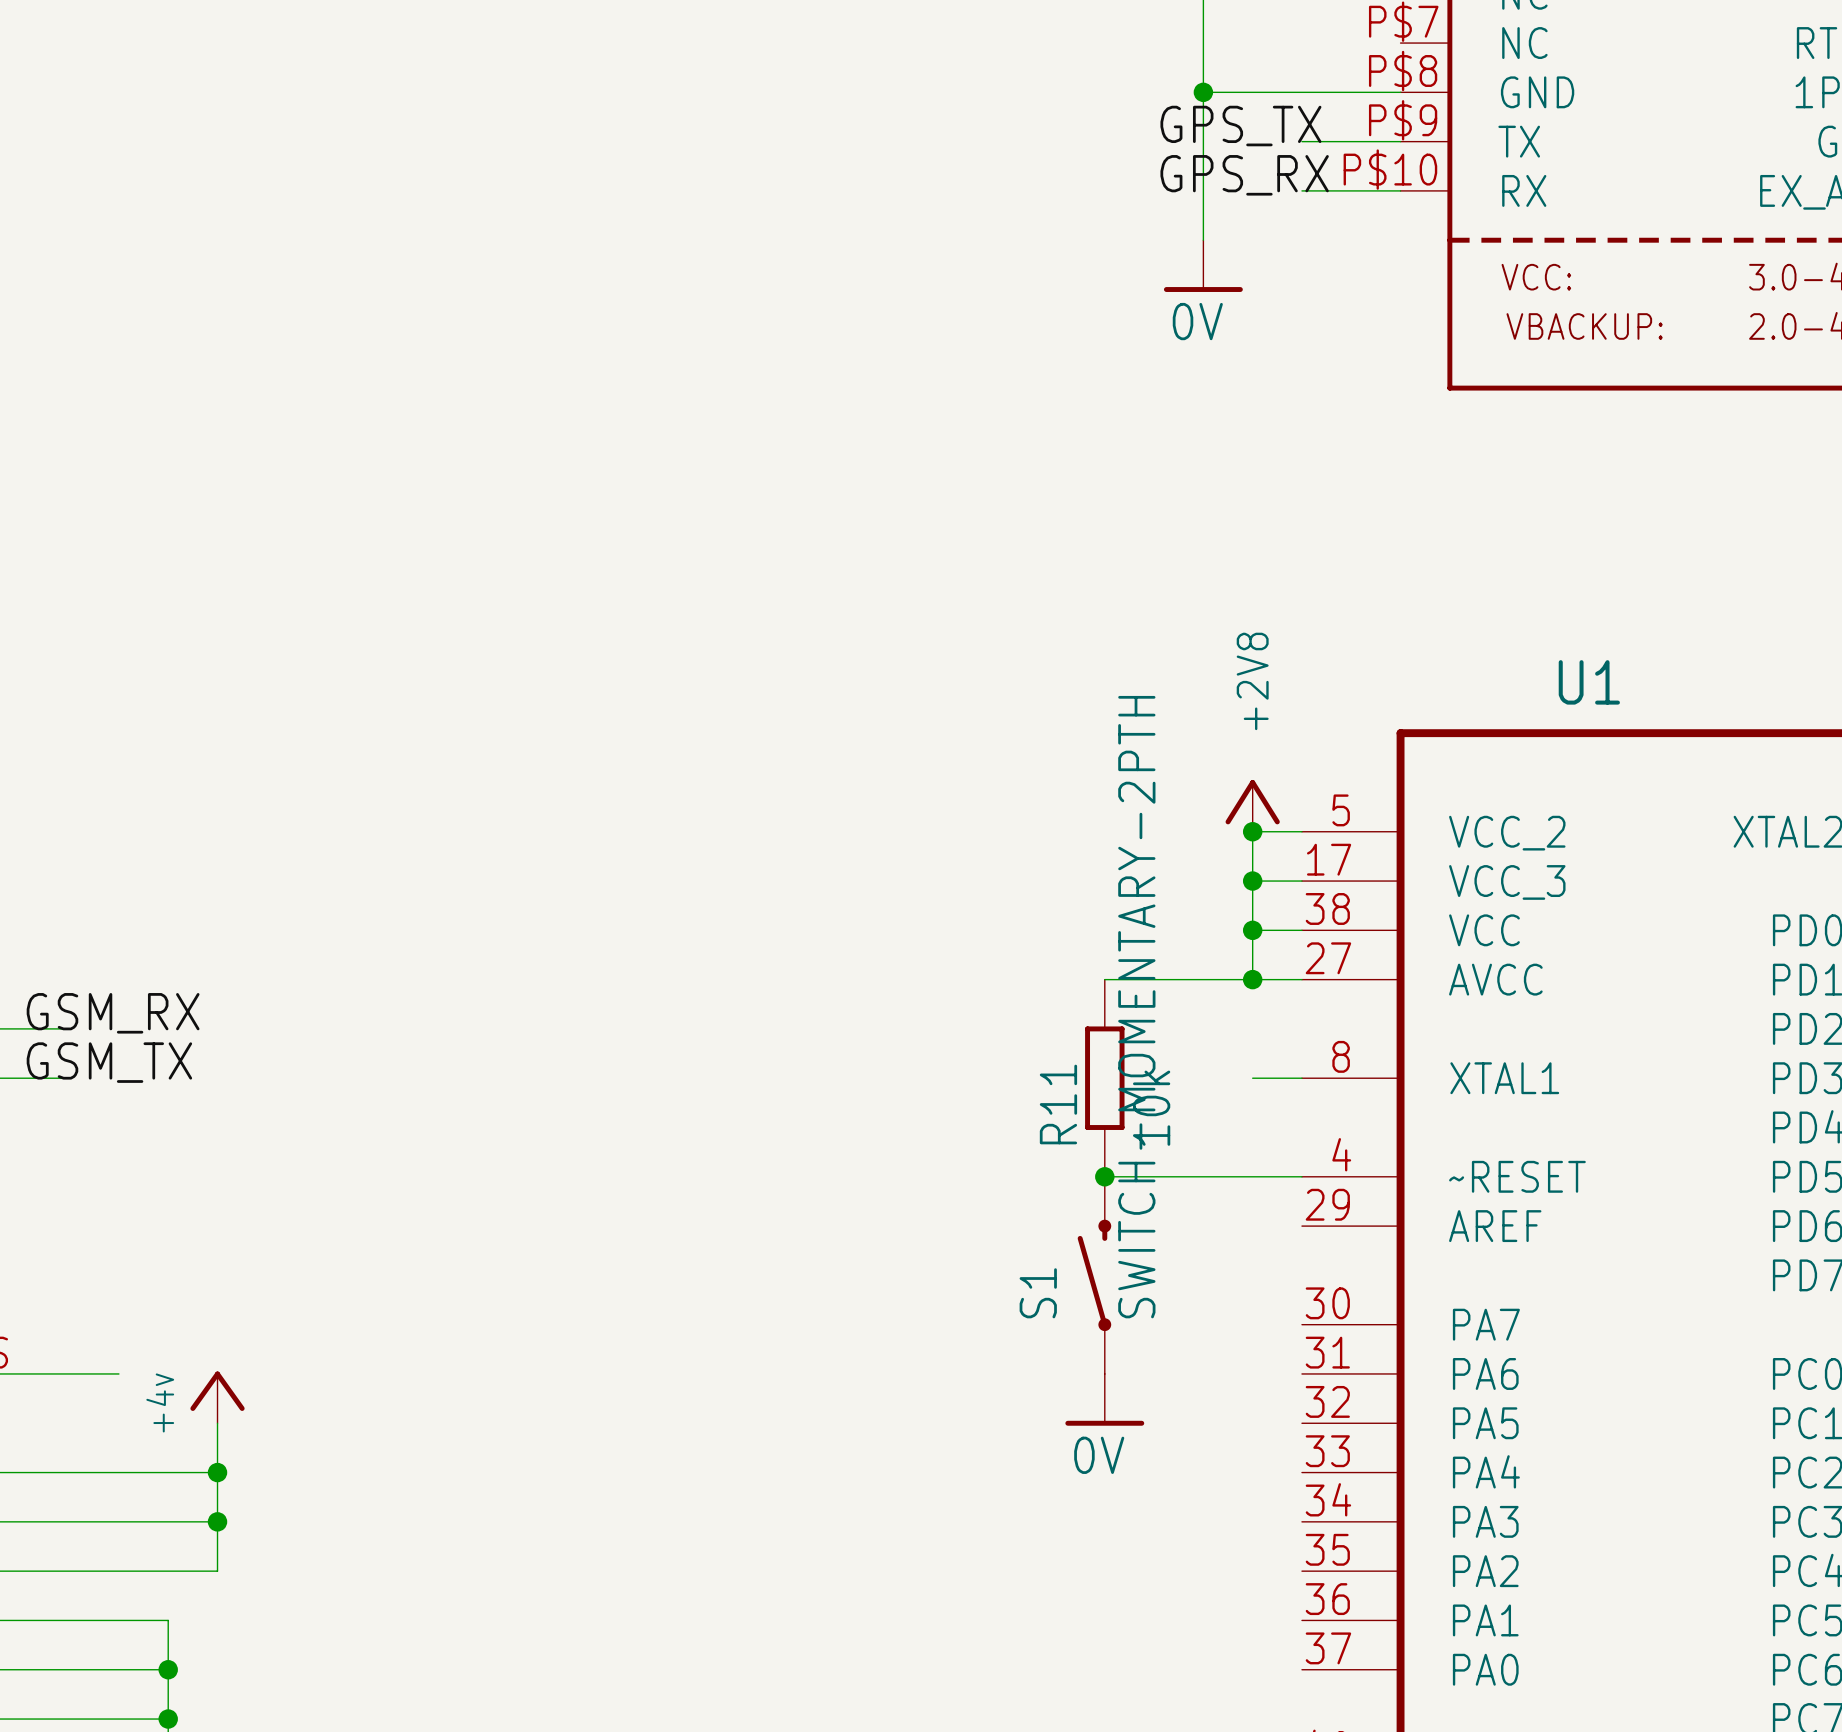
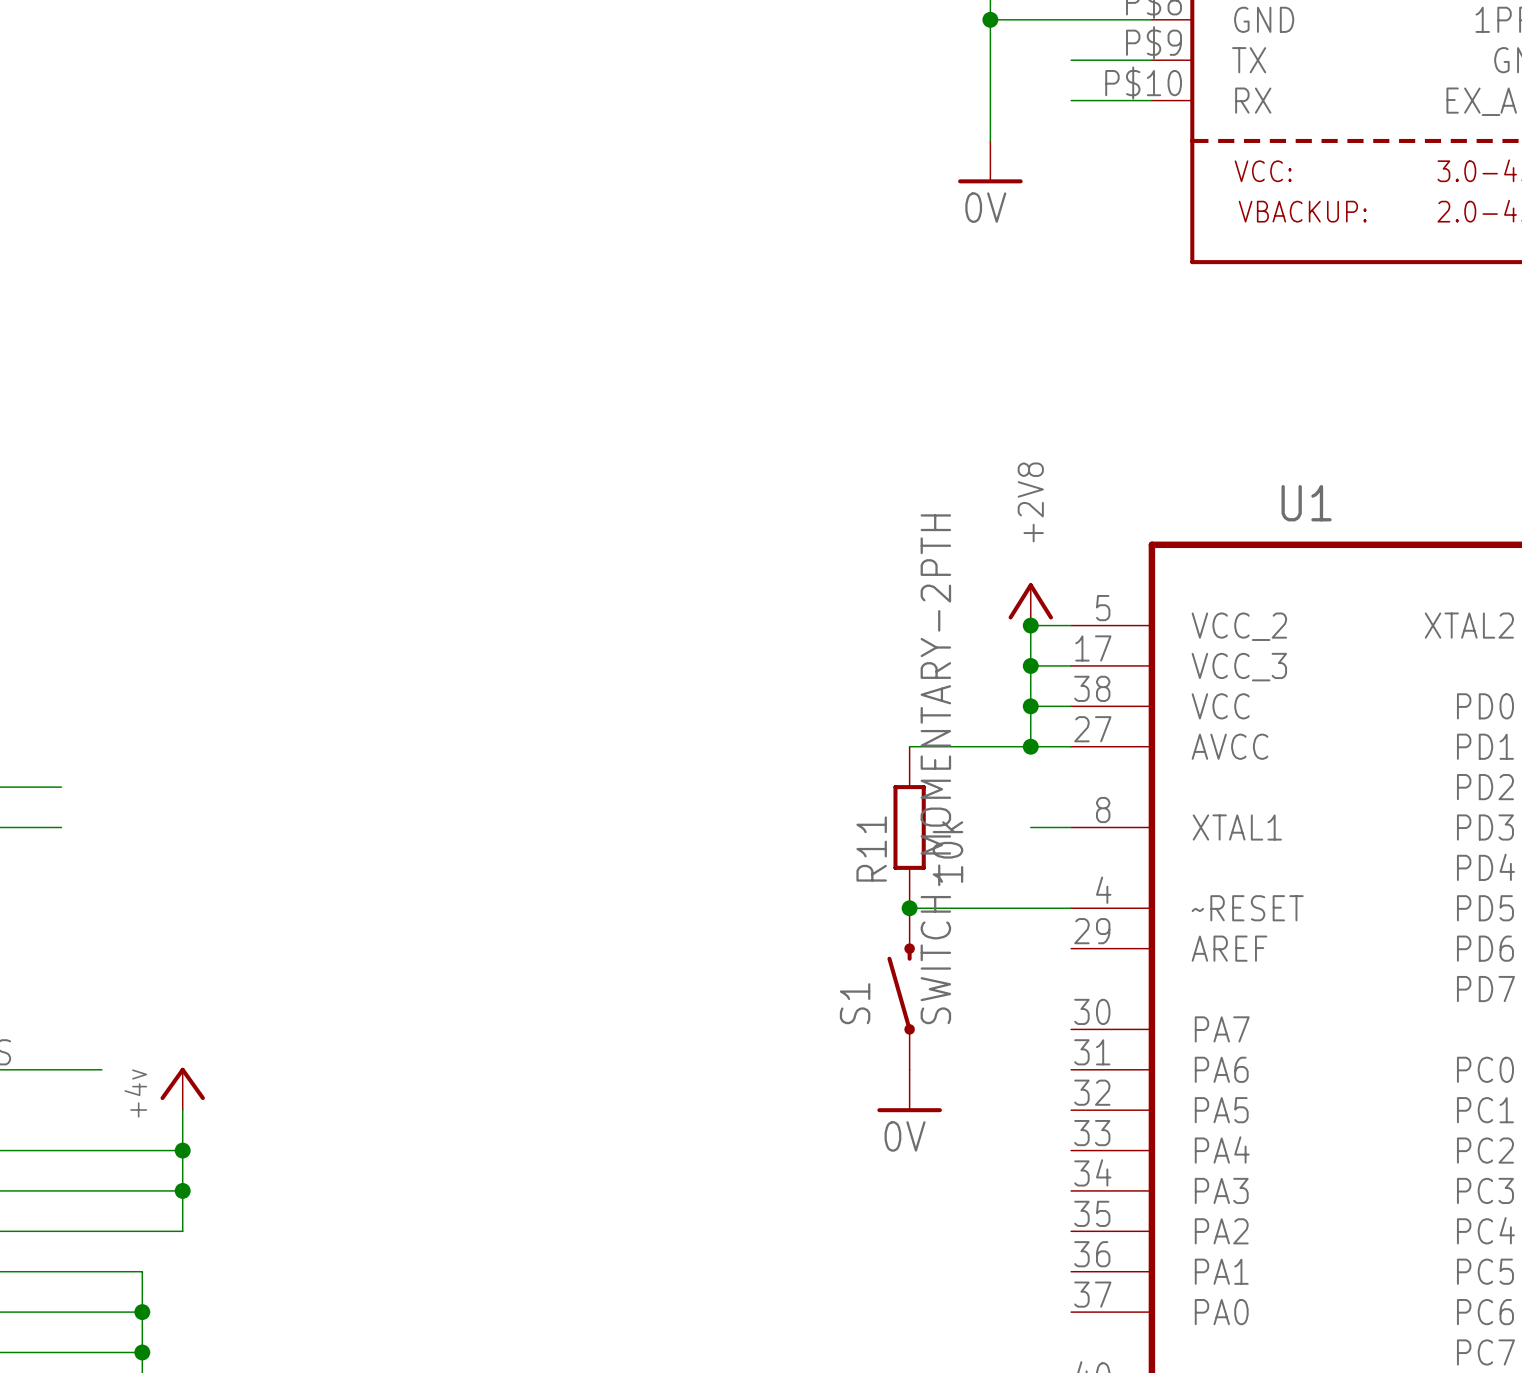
label: GPS_TX (1240, 126) -> none
label: GPS_RX (1244, 175) -> none
label: GSM_RX (113, 1013) -> none
label: GSM_TX (109, 1062) -> none

